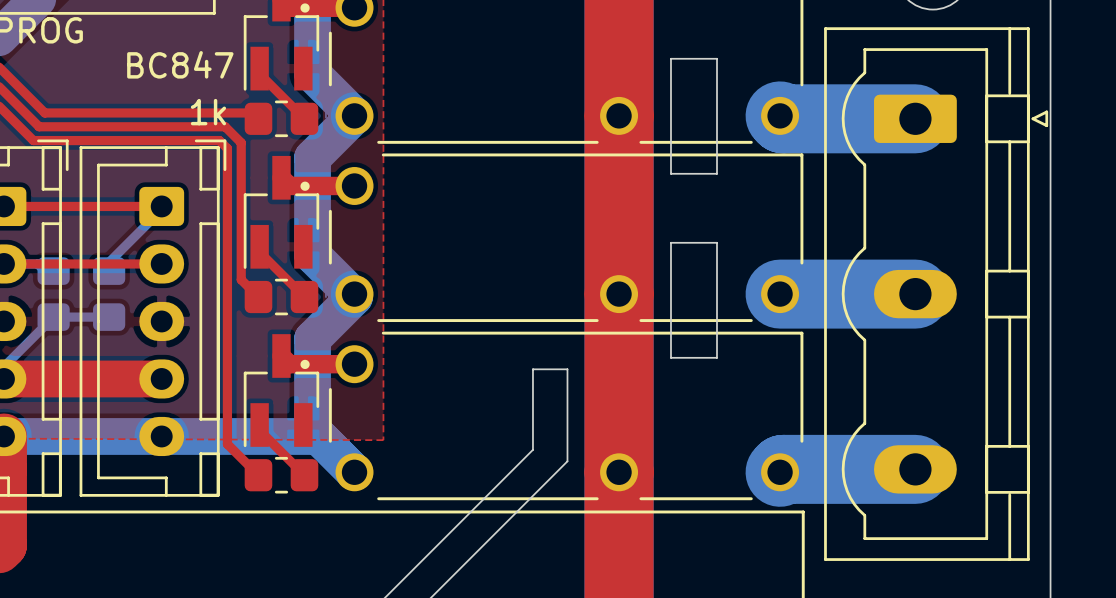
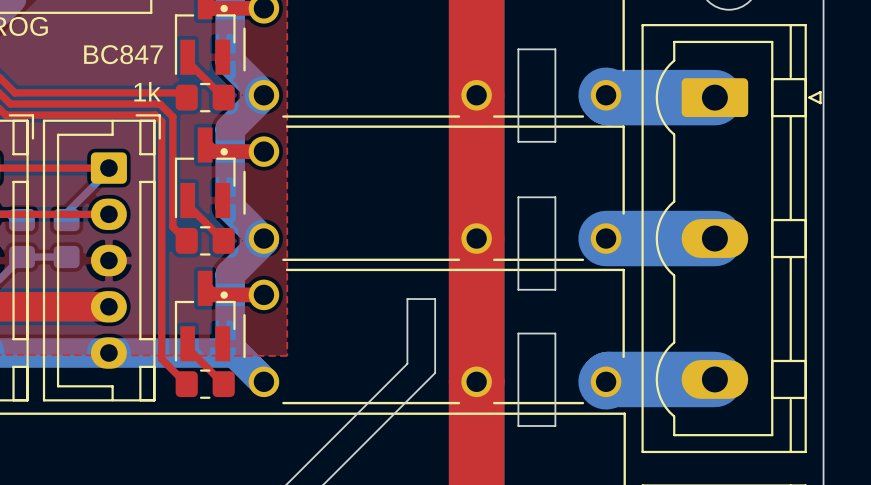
board edge: none -> (518, 333) (518, 426) (555, 426) (555, 333) (518, 333)

